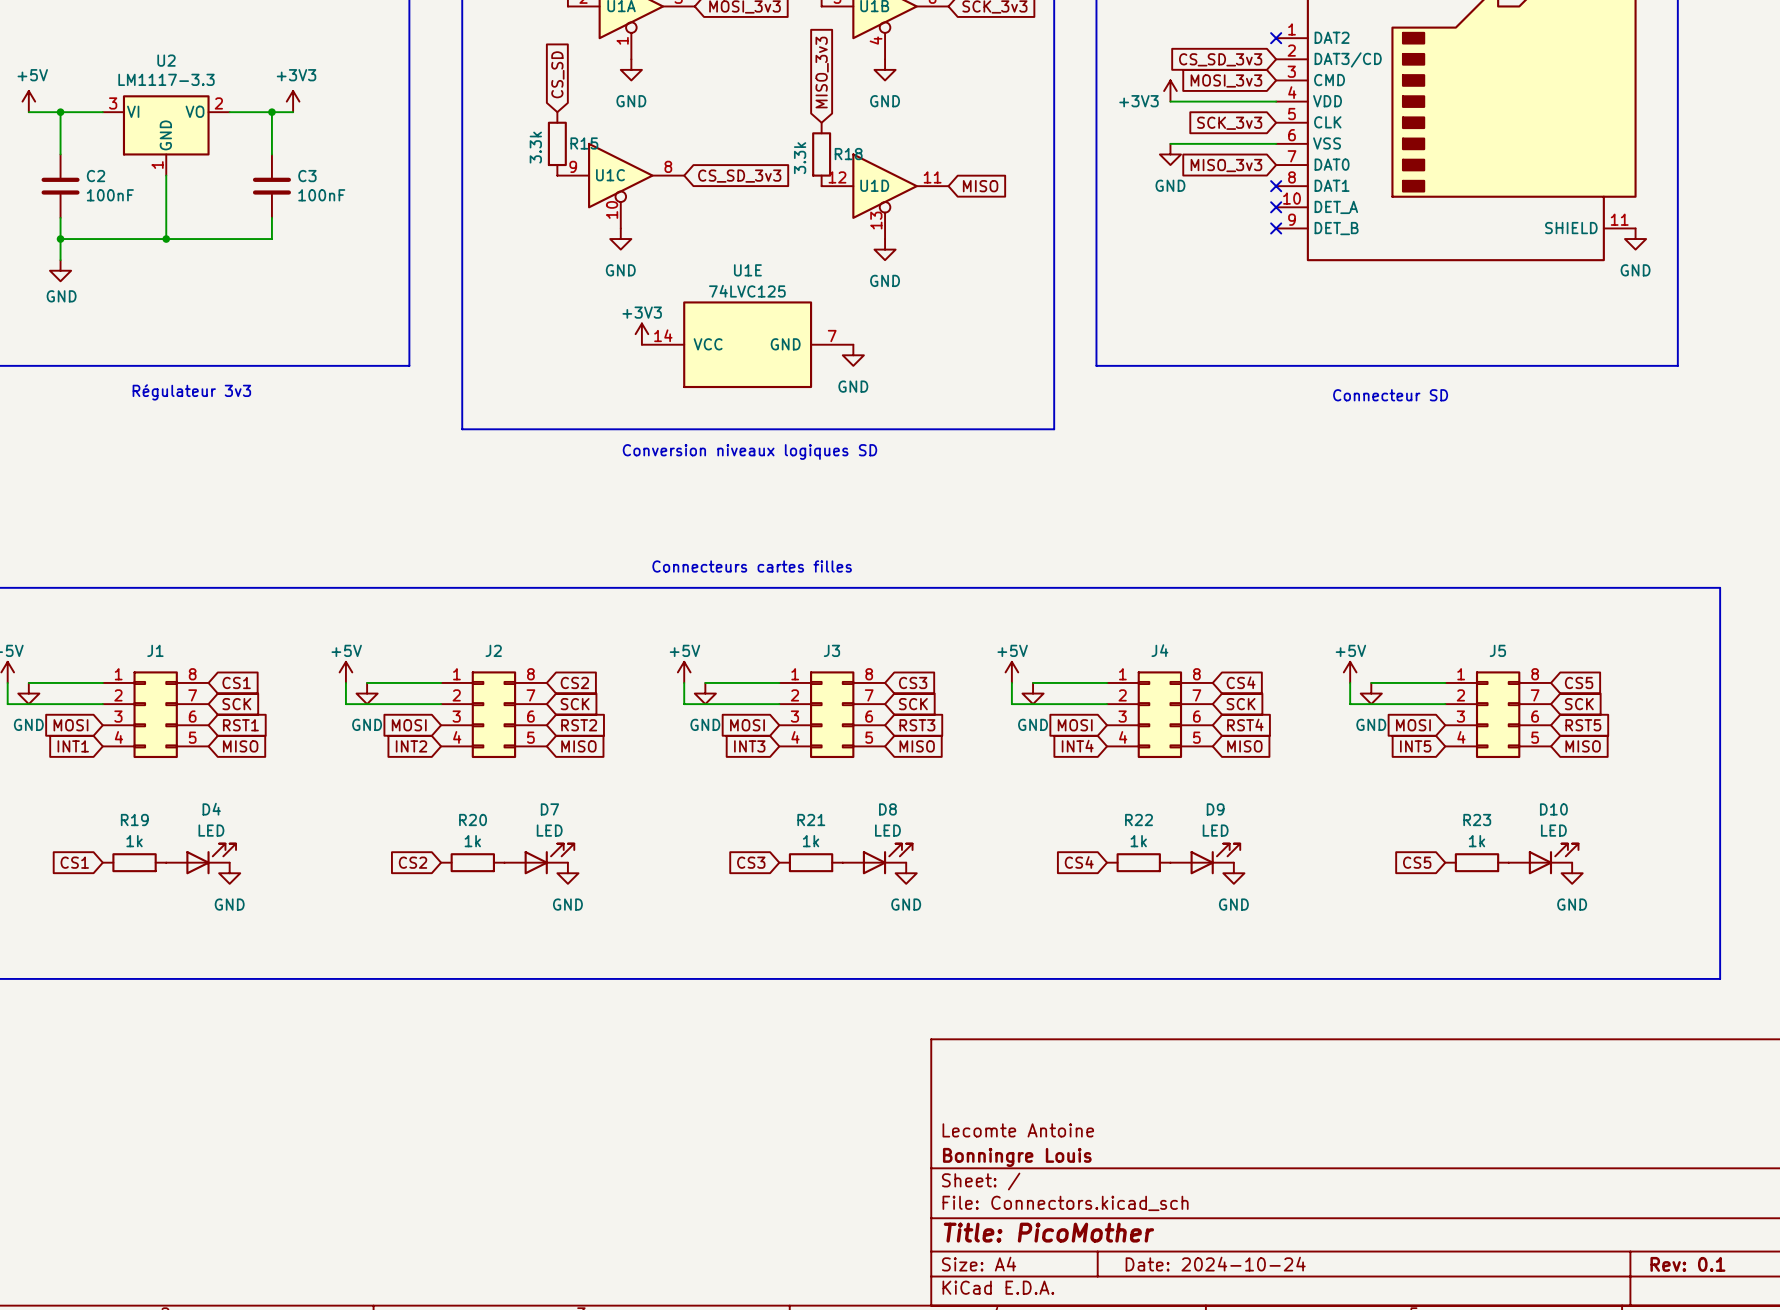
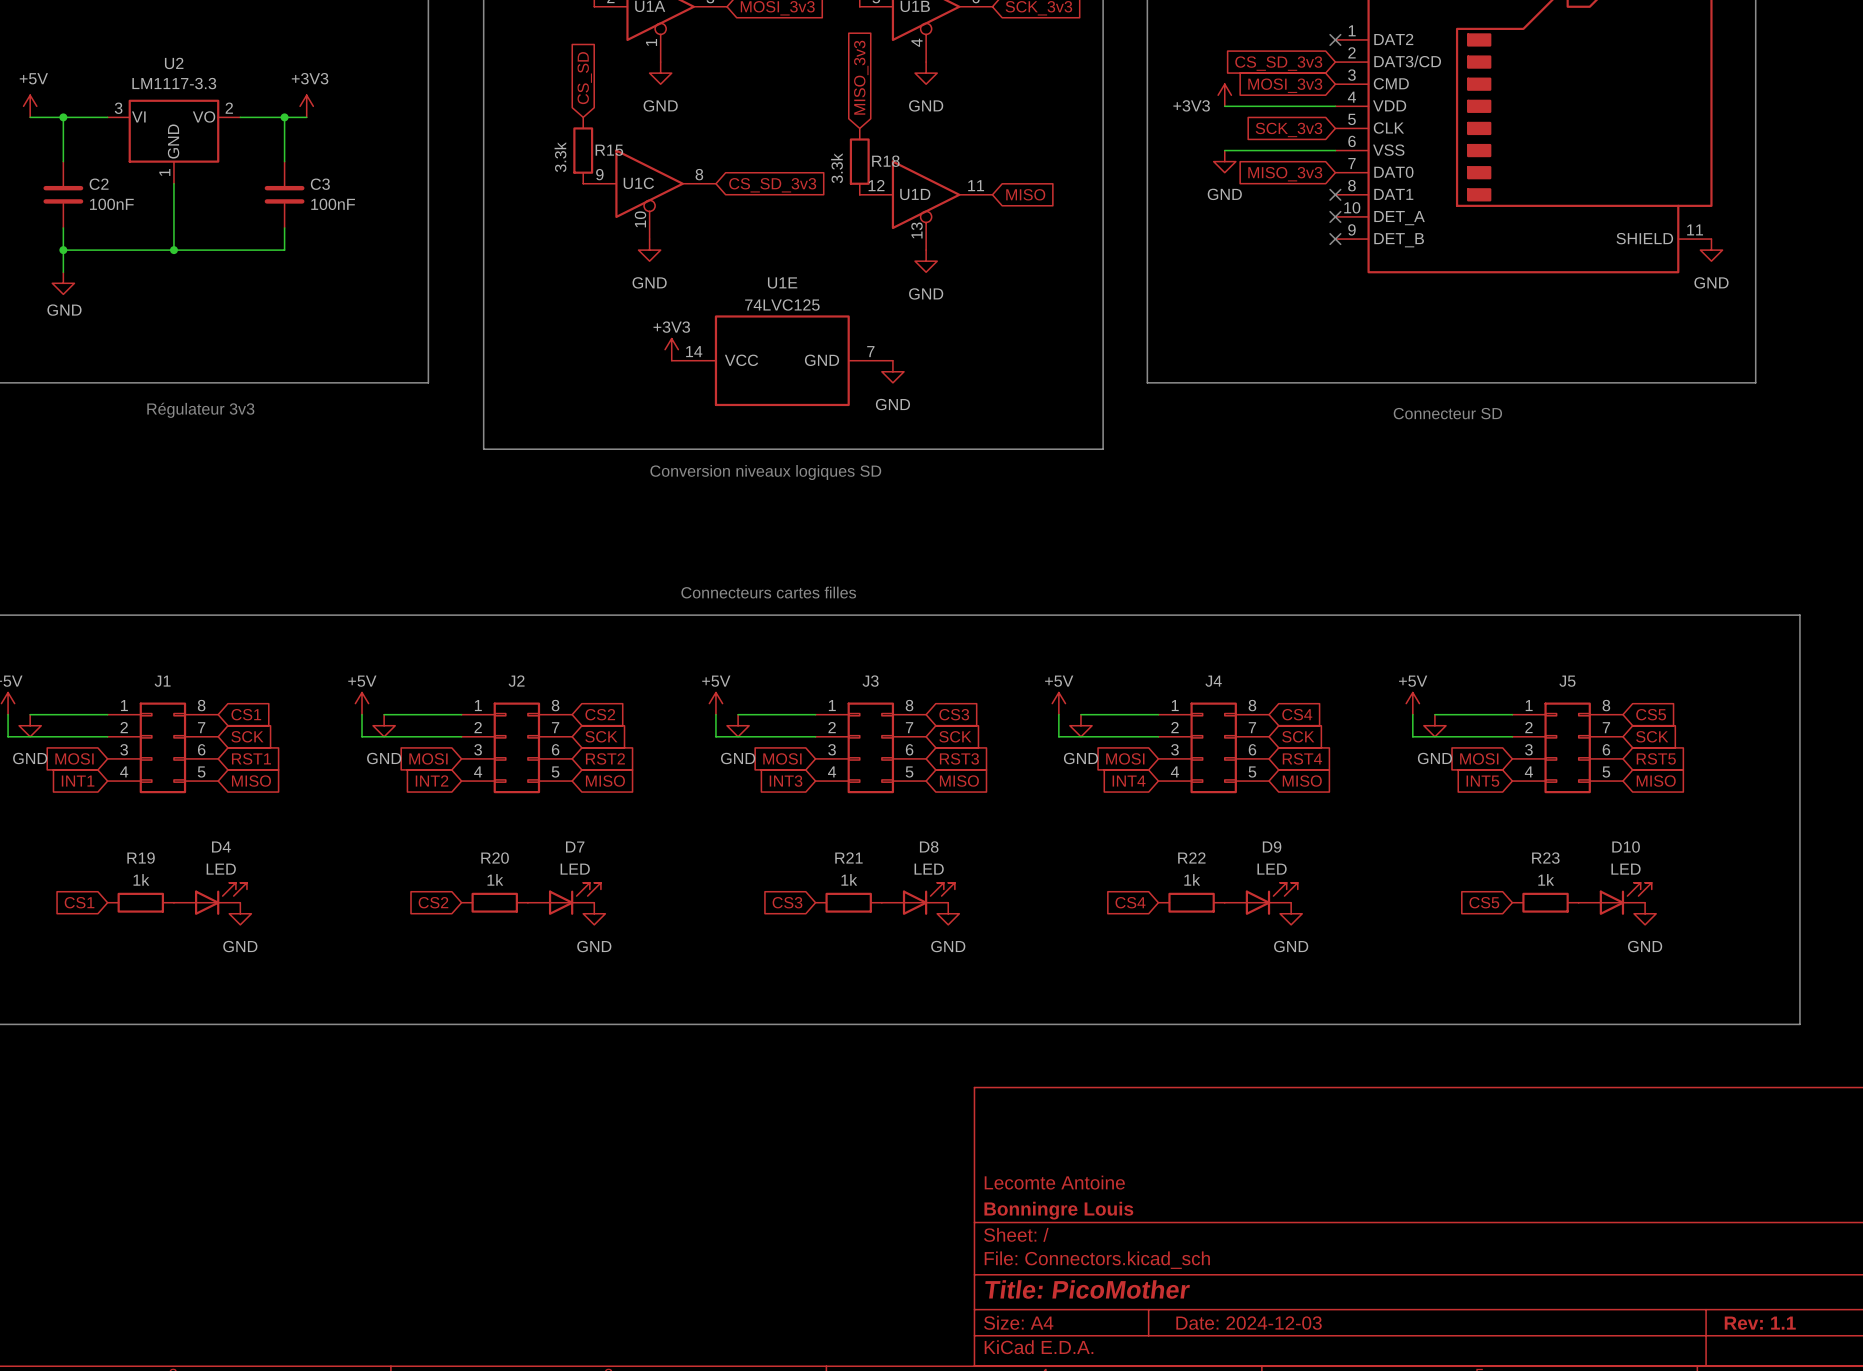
title block: Date: 2024-10-24 (1215, 1264) -> Date: 2024-12-03 (1249, 1323)
title block: Rev: 0.1 (1687, 1264) -> Rev: 1.1 (1760, 1323)

